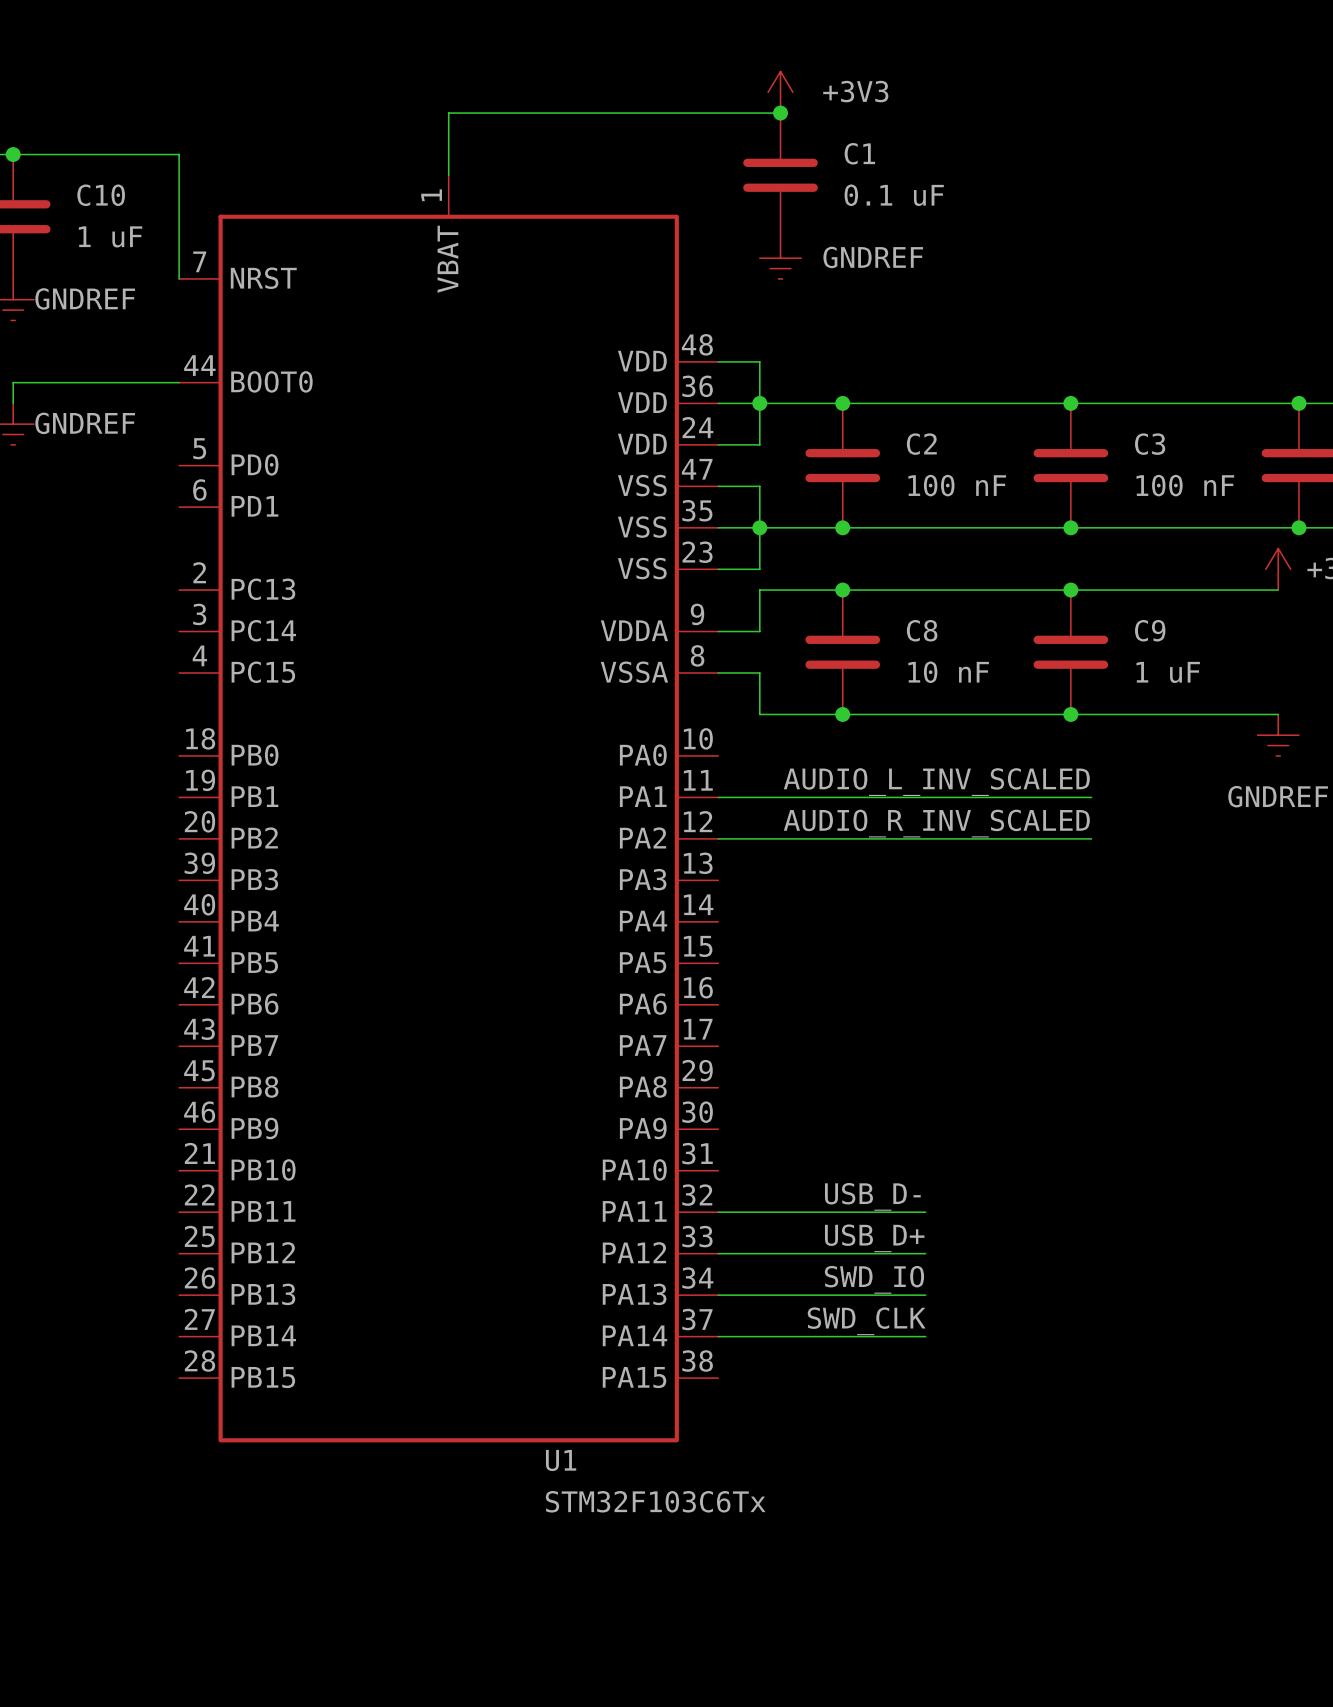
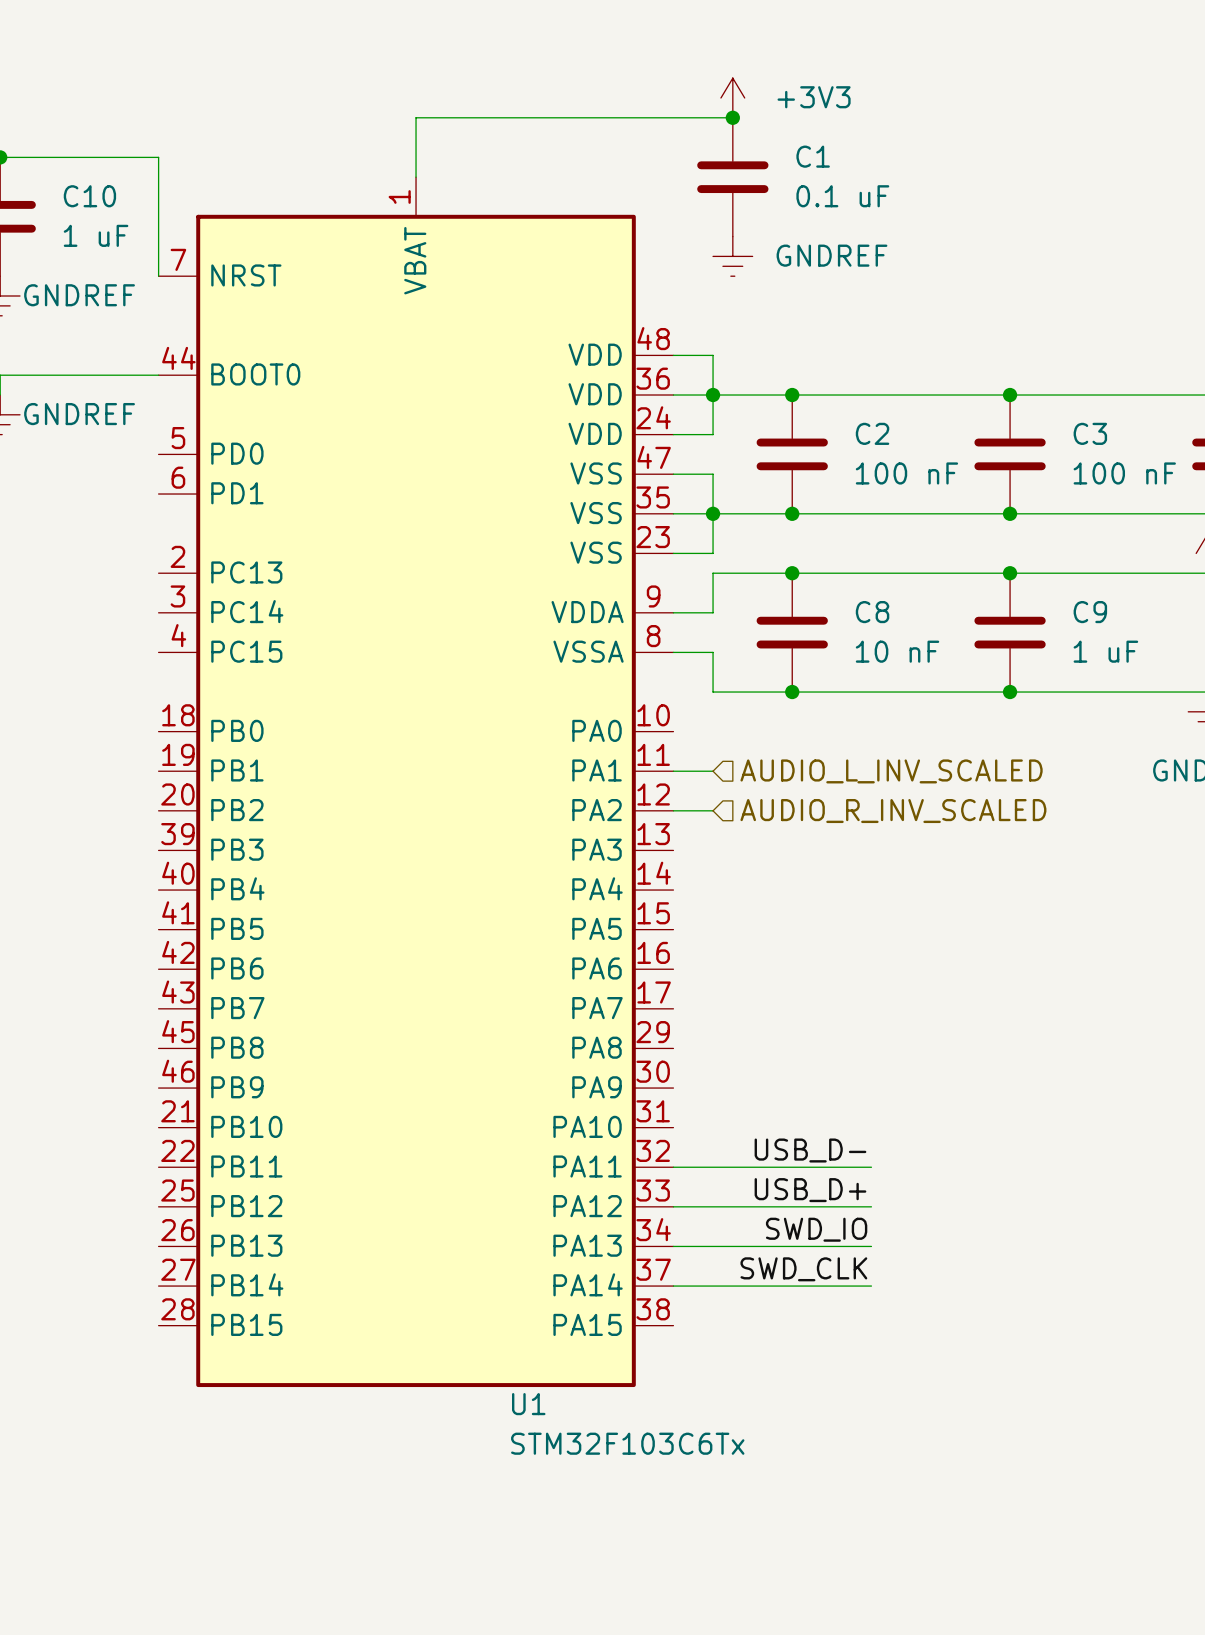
label: AUDIO_L_INV_SCALED (936, 782) -> none
wire: (759, 797) (1091, 797) -> none
hierarchical label: none -> AUDIO_L_INV_SCALED (891, 771)
label: AUDIO_R_INV_SCALED (936, 823) -> none
wire: (759, 838) (1091, 838) -> none
hierarchical label: none -> AUDIO_R_INV_SCALED (893, 811)

